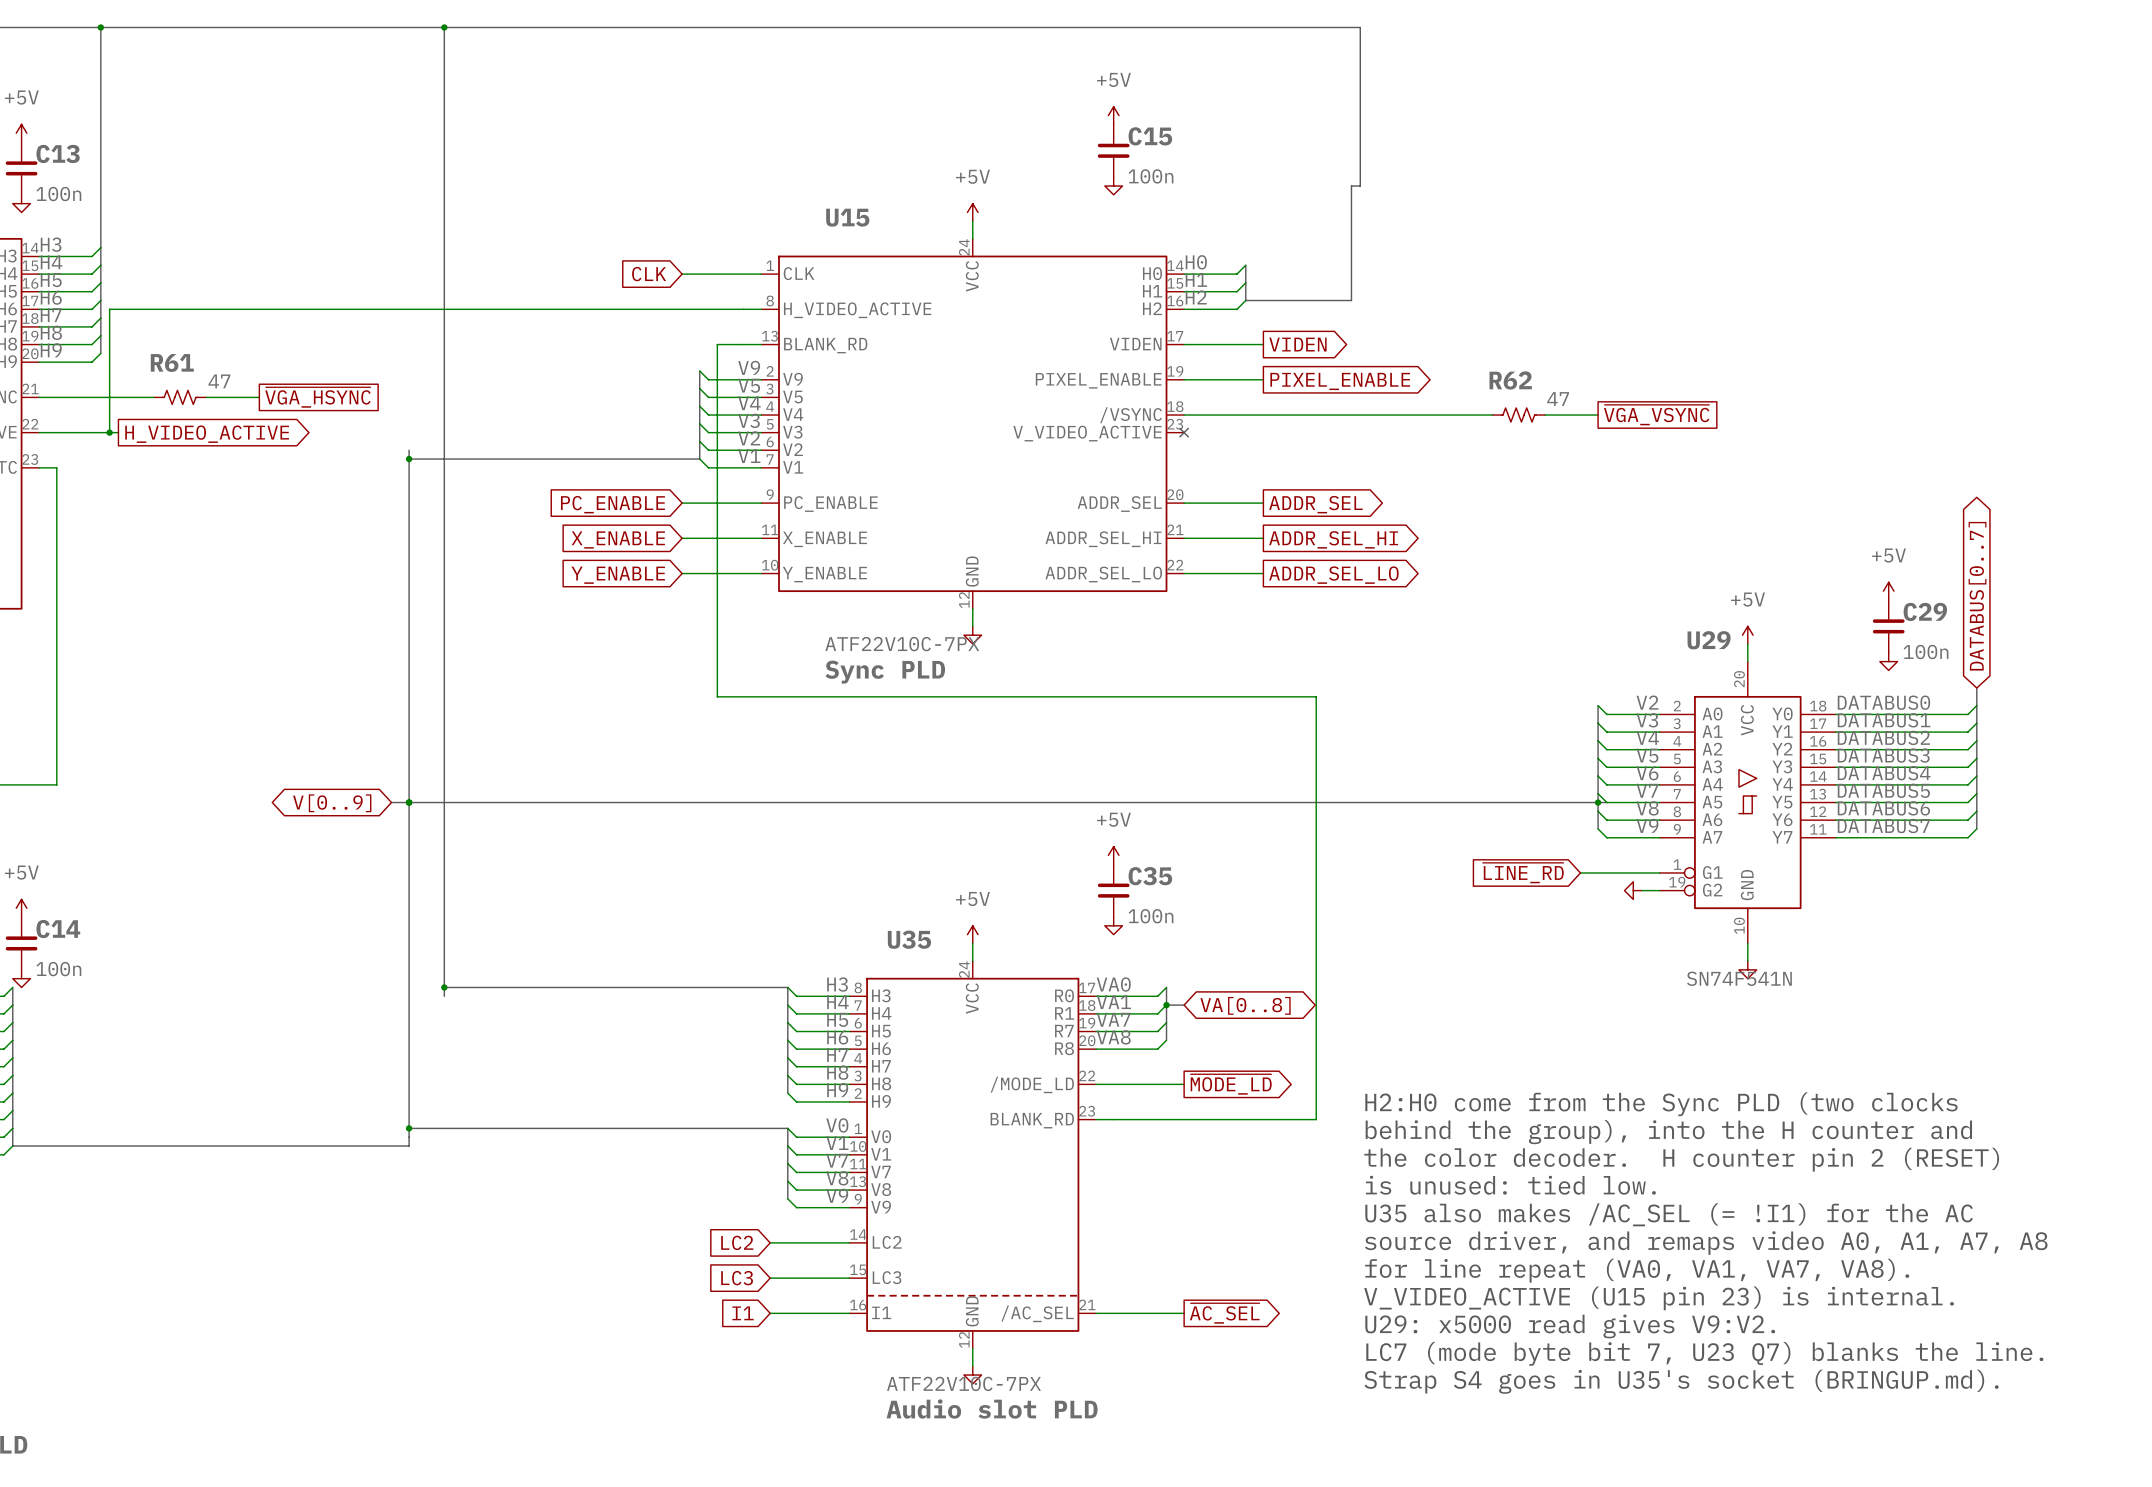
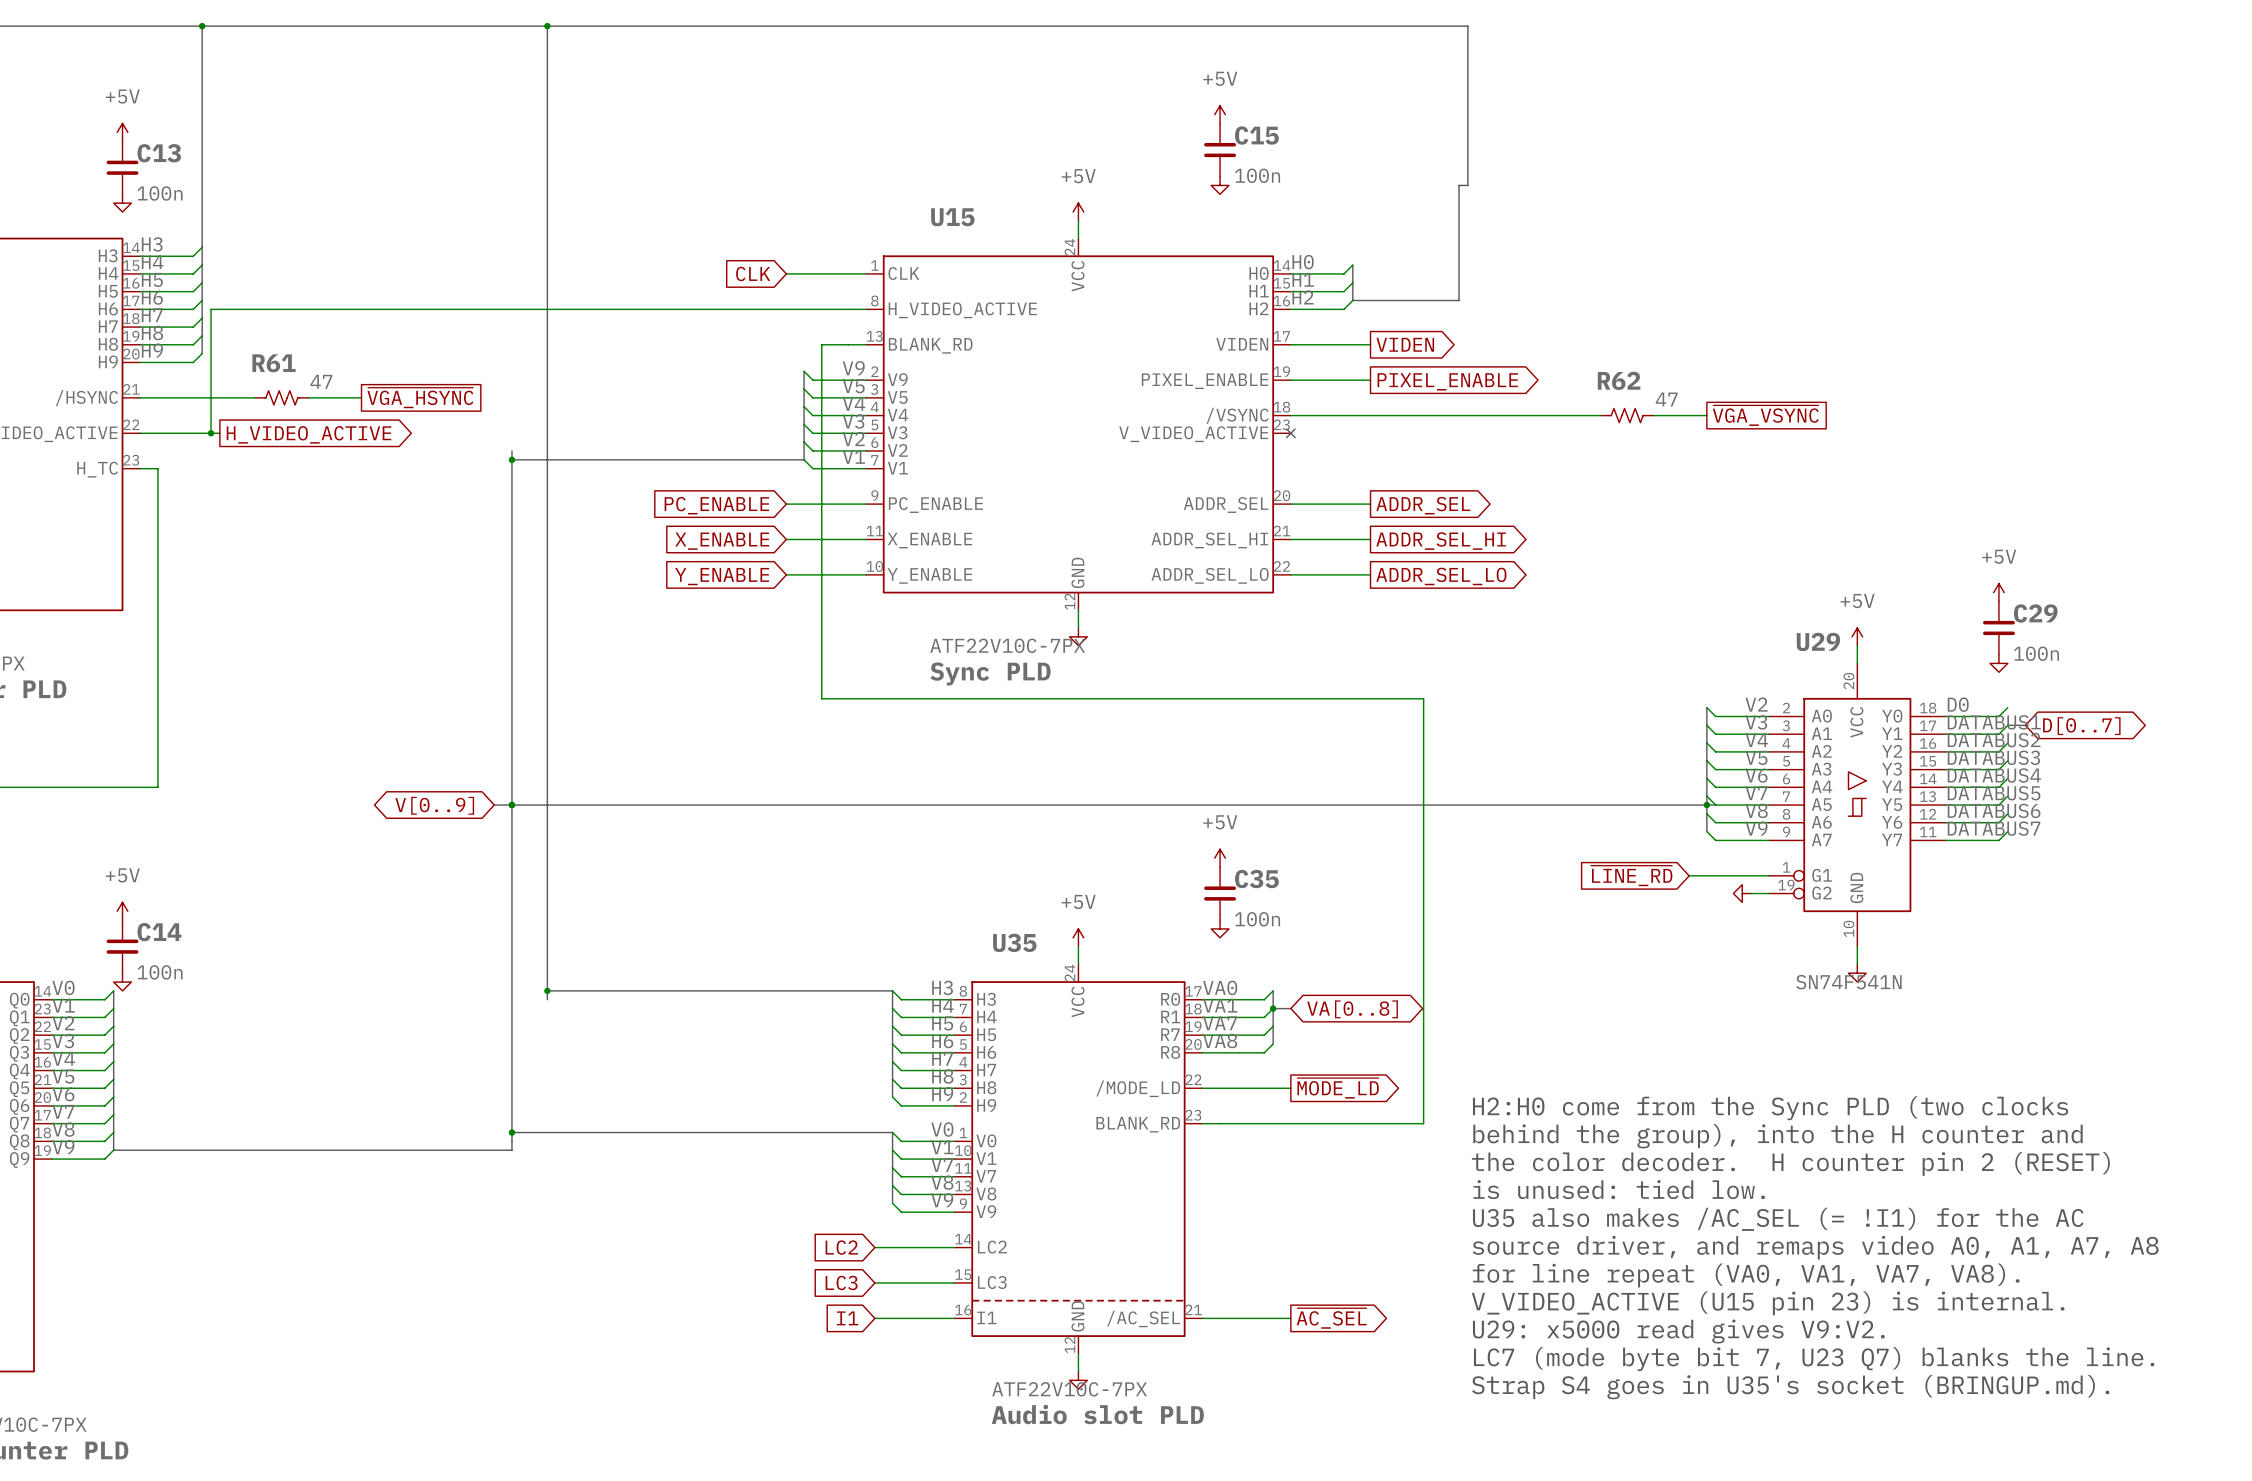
global label: DATABUS[0..7] (1977, 596) -> none
bus: (1976, 688) (1976, 828) -> none
label: DATABUS0 (1883, 702) -> D0 (1958, 704)
wire: (1976, 705) (1967, 714) (1888, 714) -> (2007, 707) (1998, 716)
bus: none -> (2007, 725) (2025, 725)
wire: (1976, 723) (1967, 732) (1888, 732) -> (2007, 725) (1998, 734)
global label: none -> D[0..7] (2081, 726)
wire: (1976, 740) (1967, 749) (1888, 749) -> (2007, 743) (1998, 751)
wire: (1976, 758) (1967, 767) (1888, 767) -> (2007, 760) (1998, 769)
wire: (1976, 776) (1967, 784) (1888, 784) -> (2007, 778) (1998, 787)
wire: (1976, 793) (1967, 802) (1888, 802) -> (2007, 796) (1998, 805)
wire: (1976, 811) (1967, 820) (1888, 820) -> (2007, 813) (1998, 822)
wire: (1976, 828) (1967, 837) (1888, 837) -> (2007, 831) (1998, 840)

